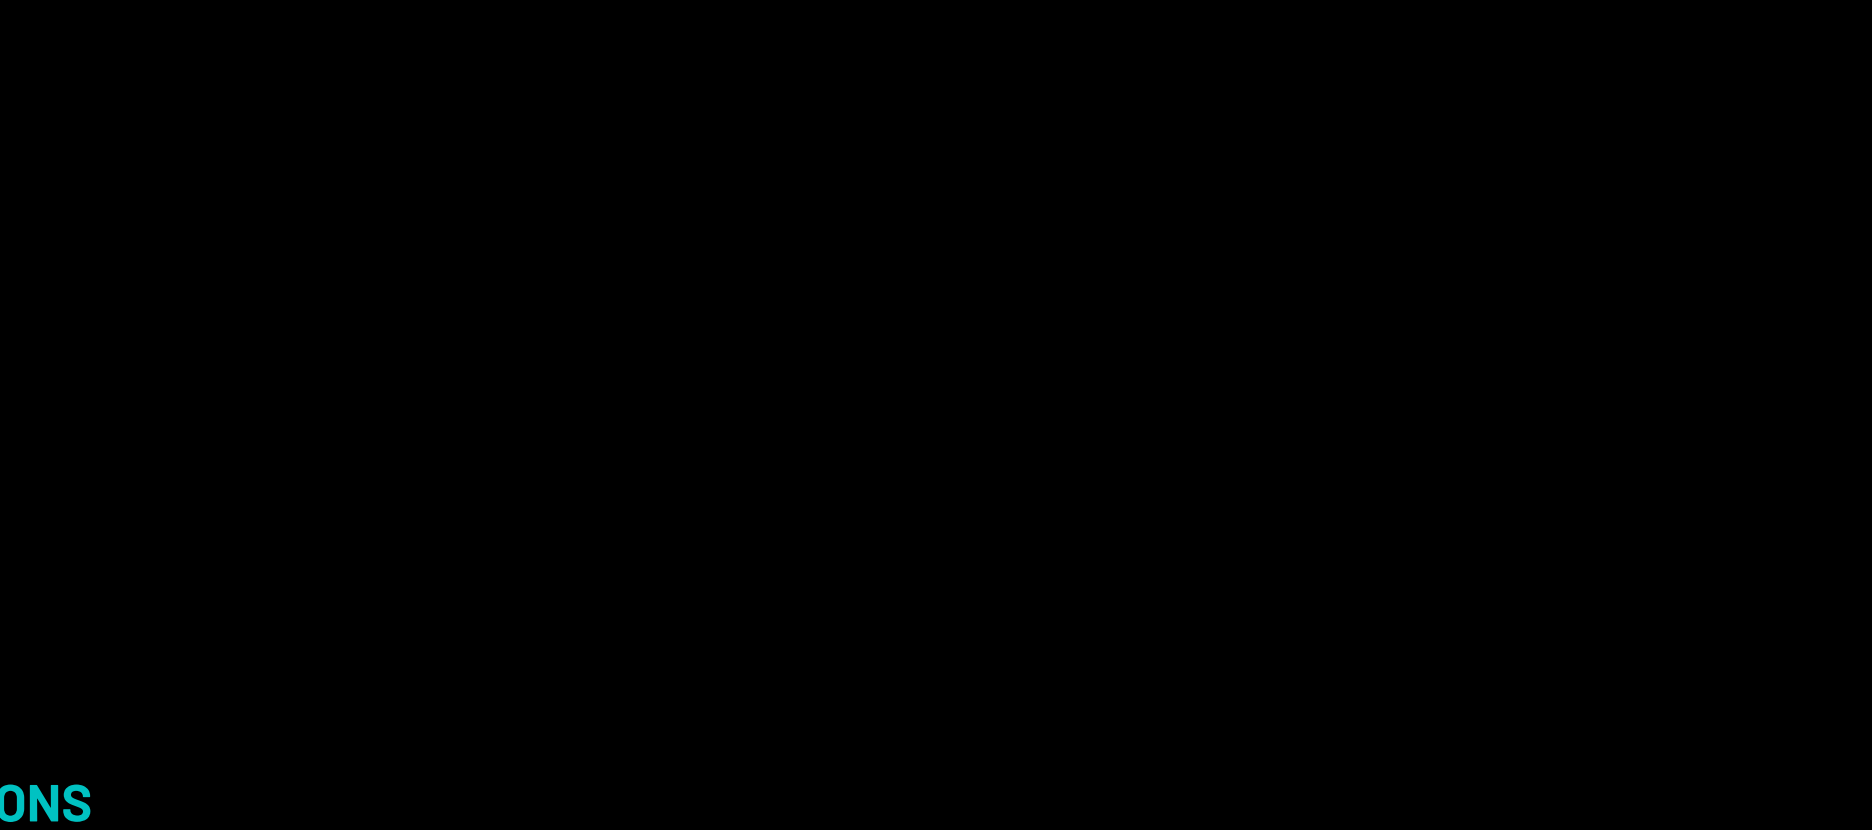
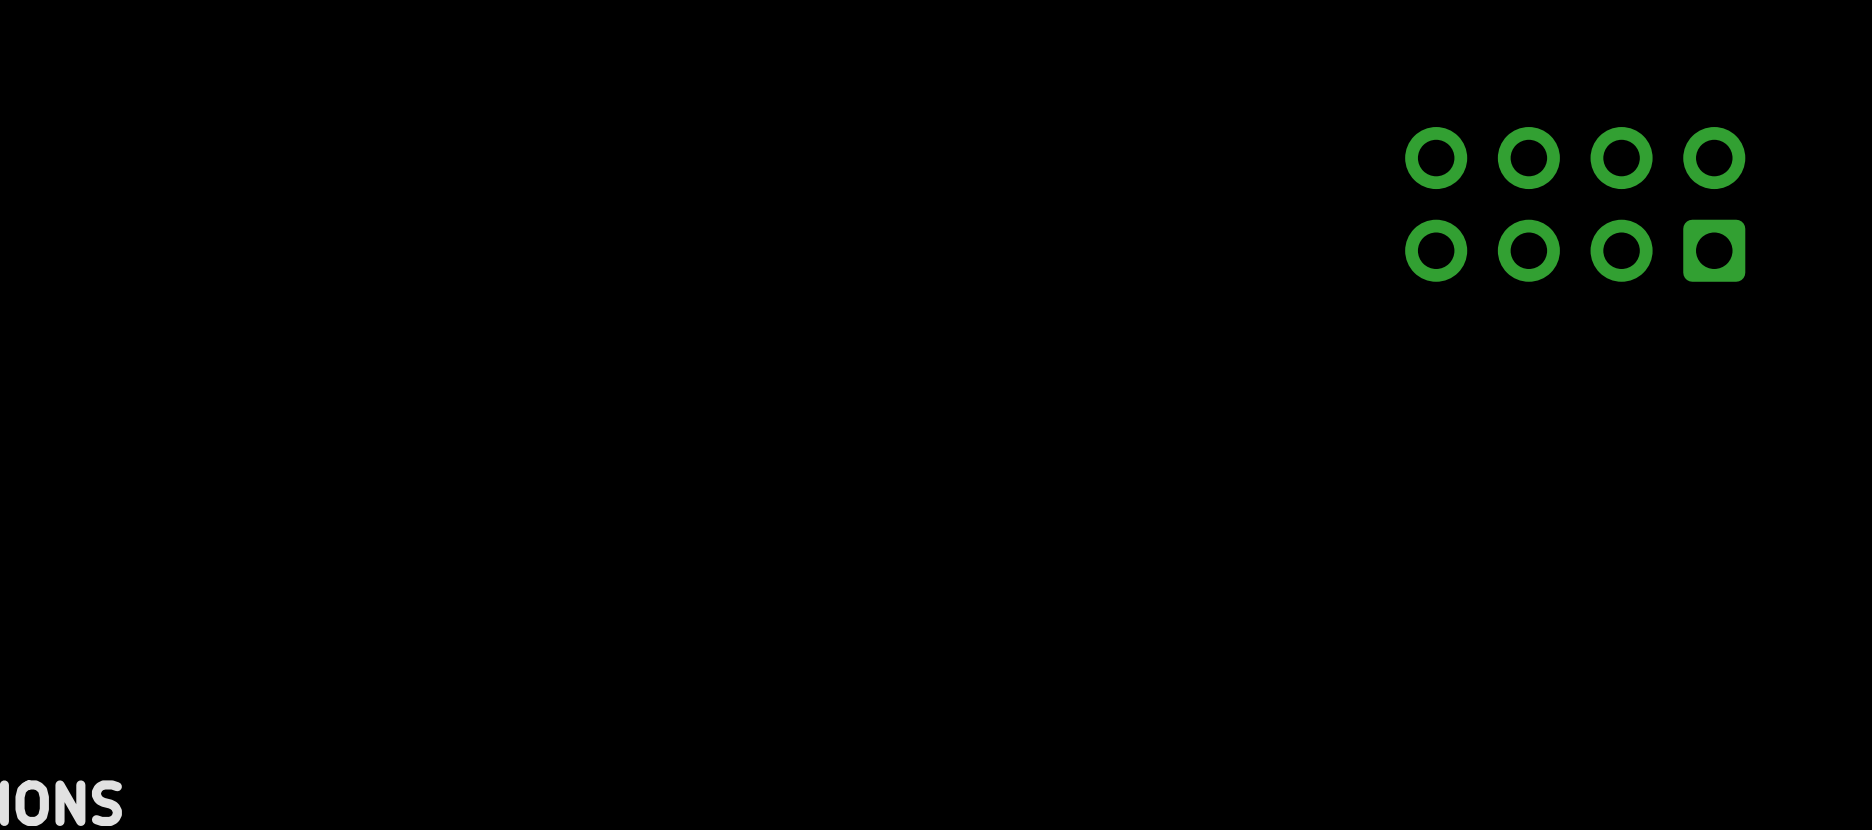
part: none -> (1575, 204)

